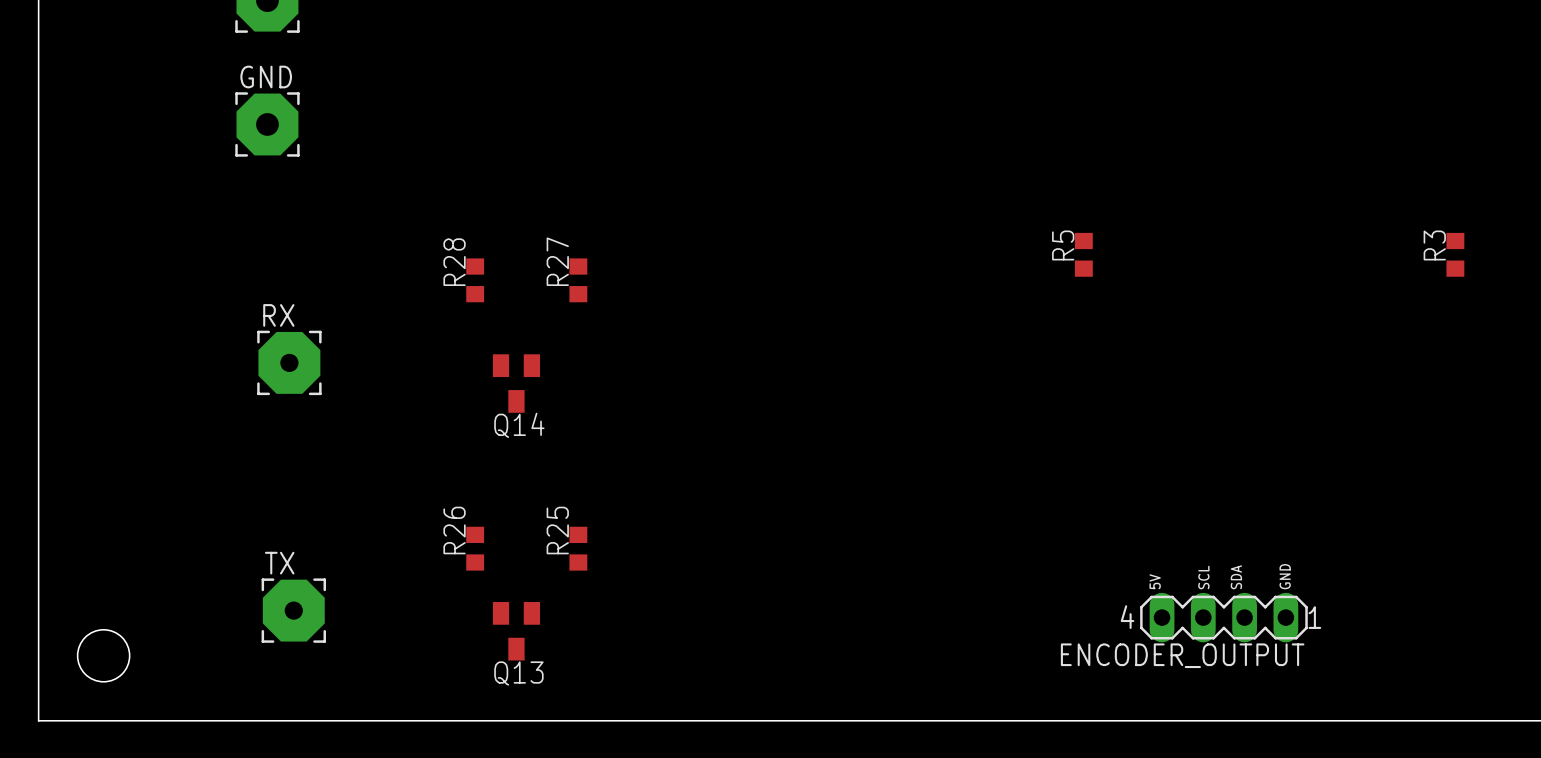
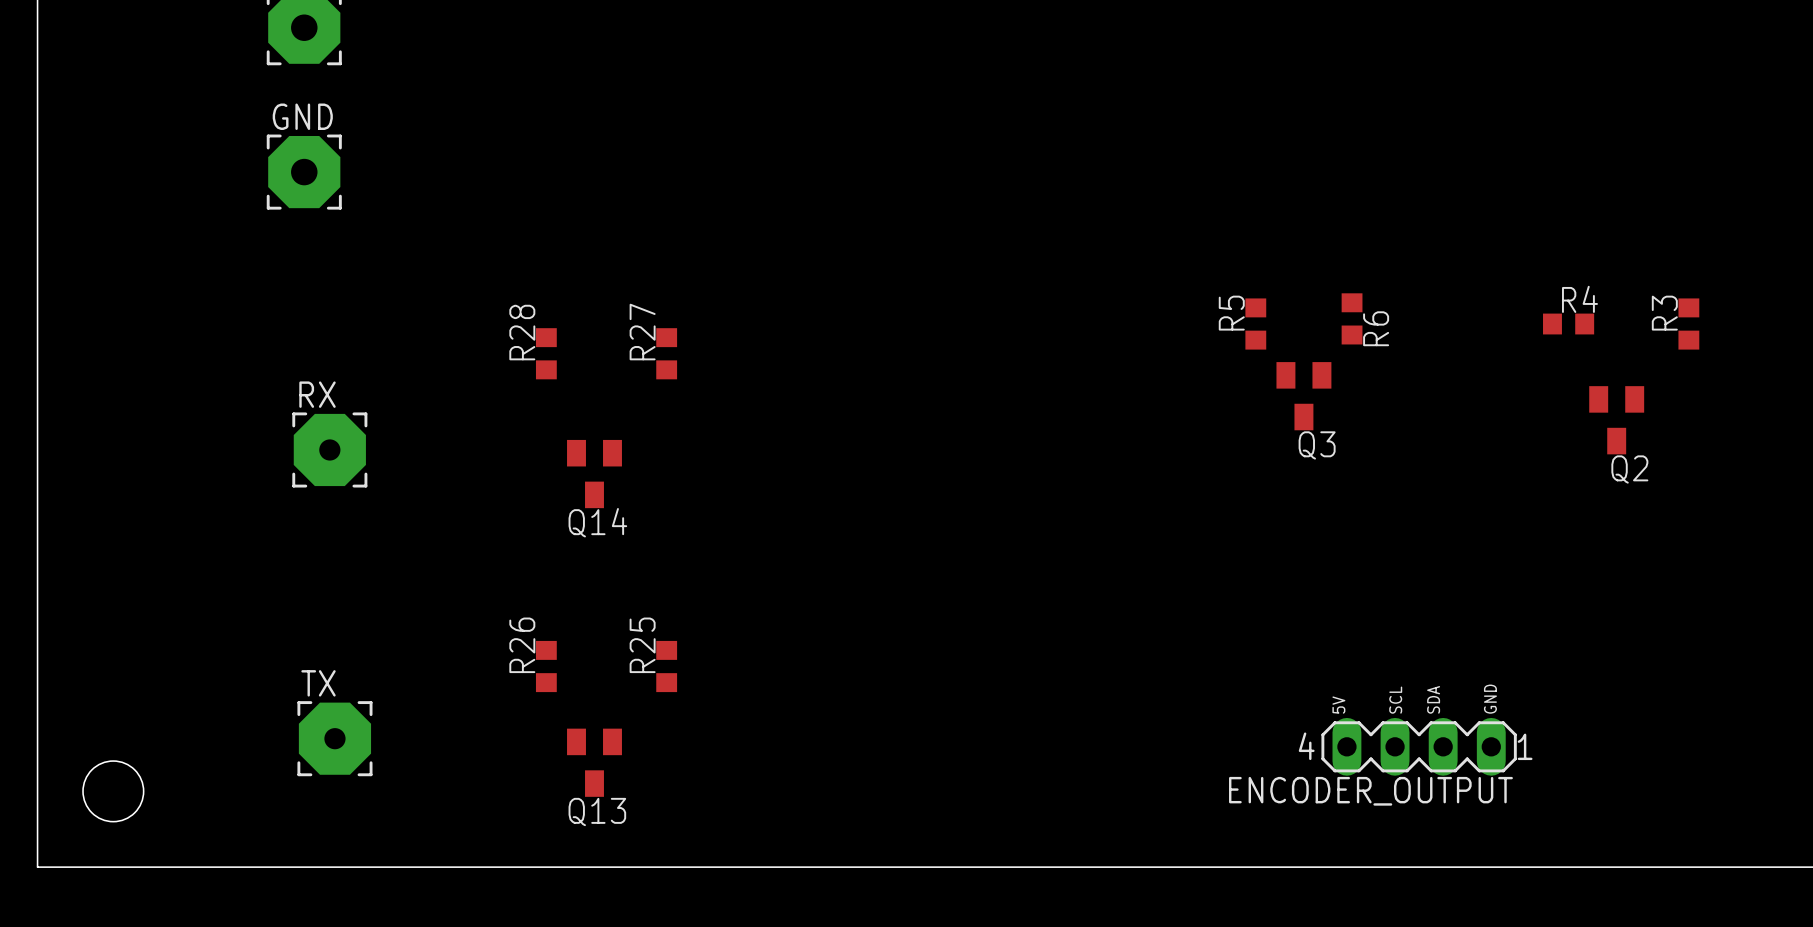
R6: none -> (1352, 318)
R4: none -> (1568, 324)
Q3: none -> (1303, 396)
Q2: none -> (1616, 420)

